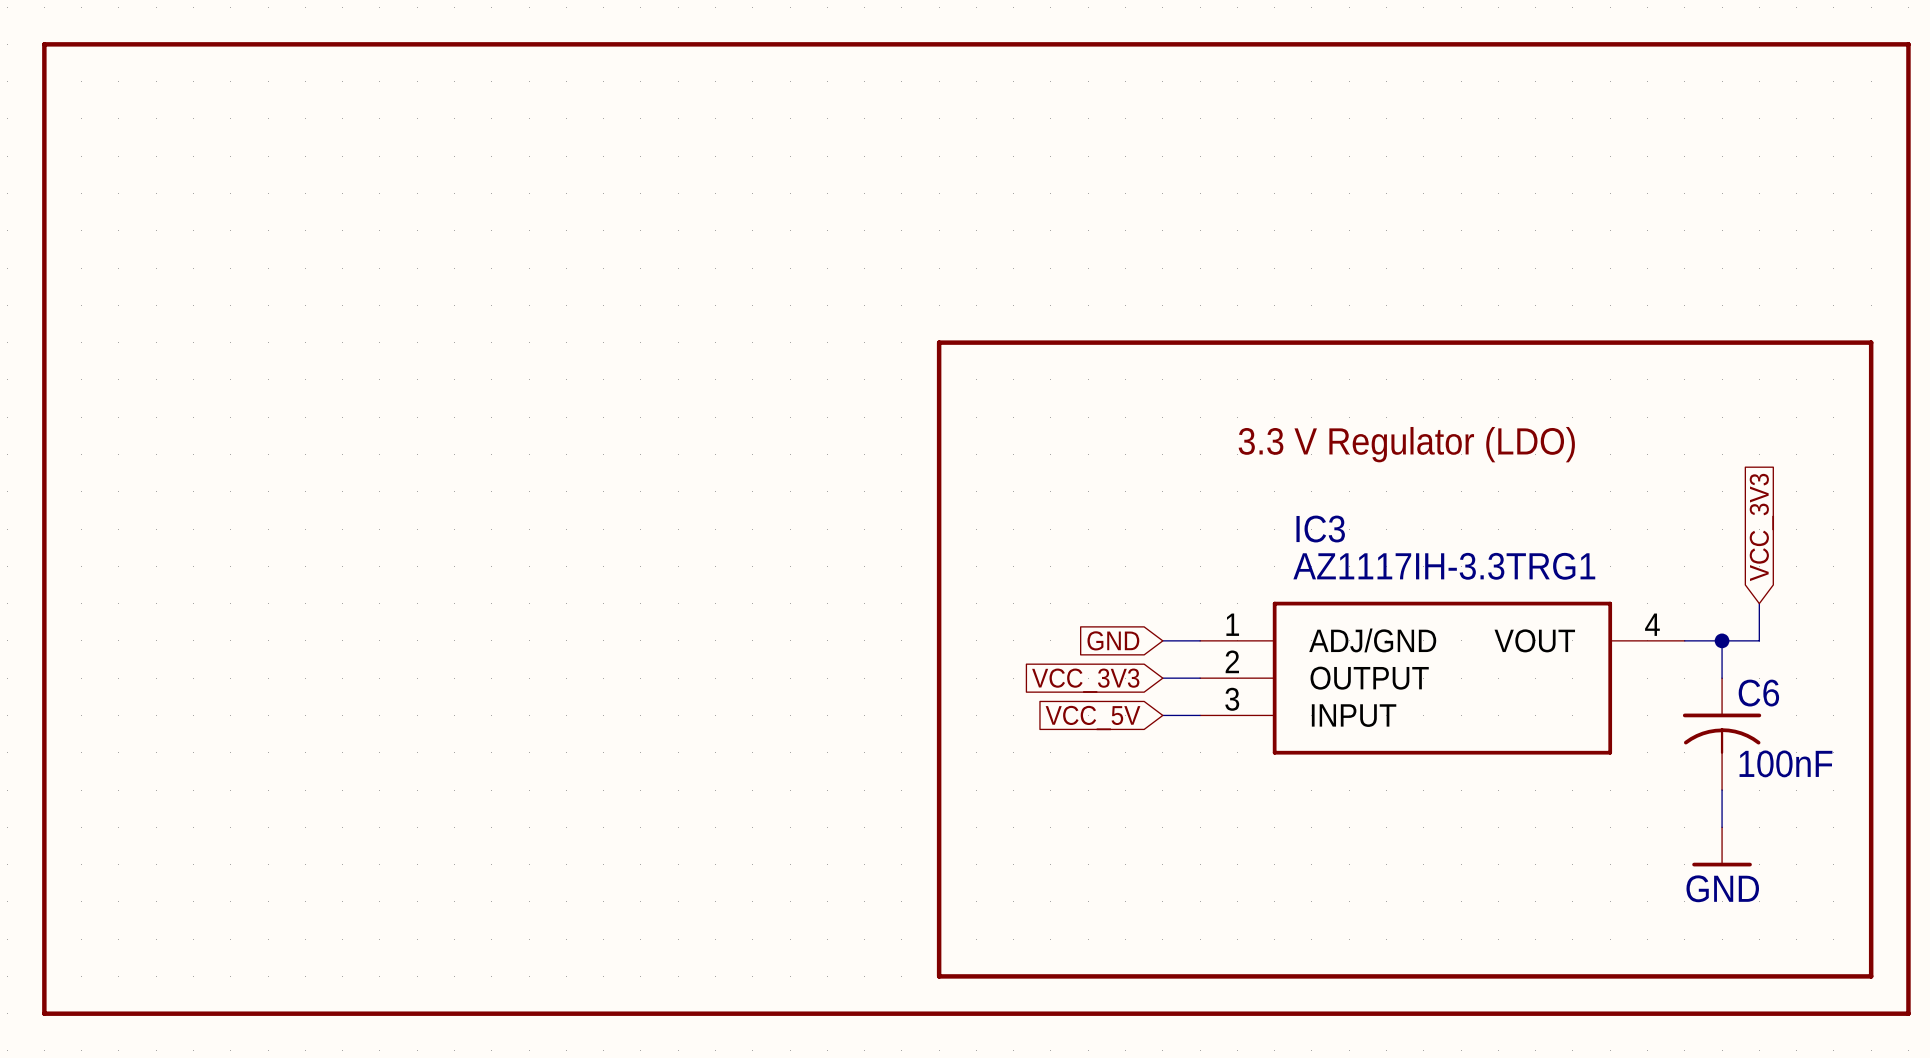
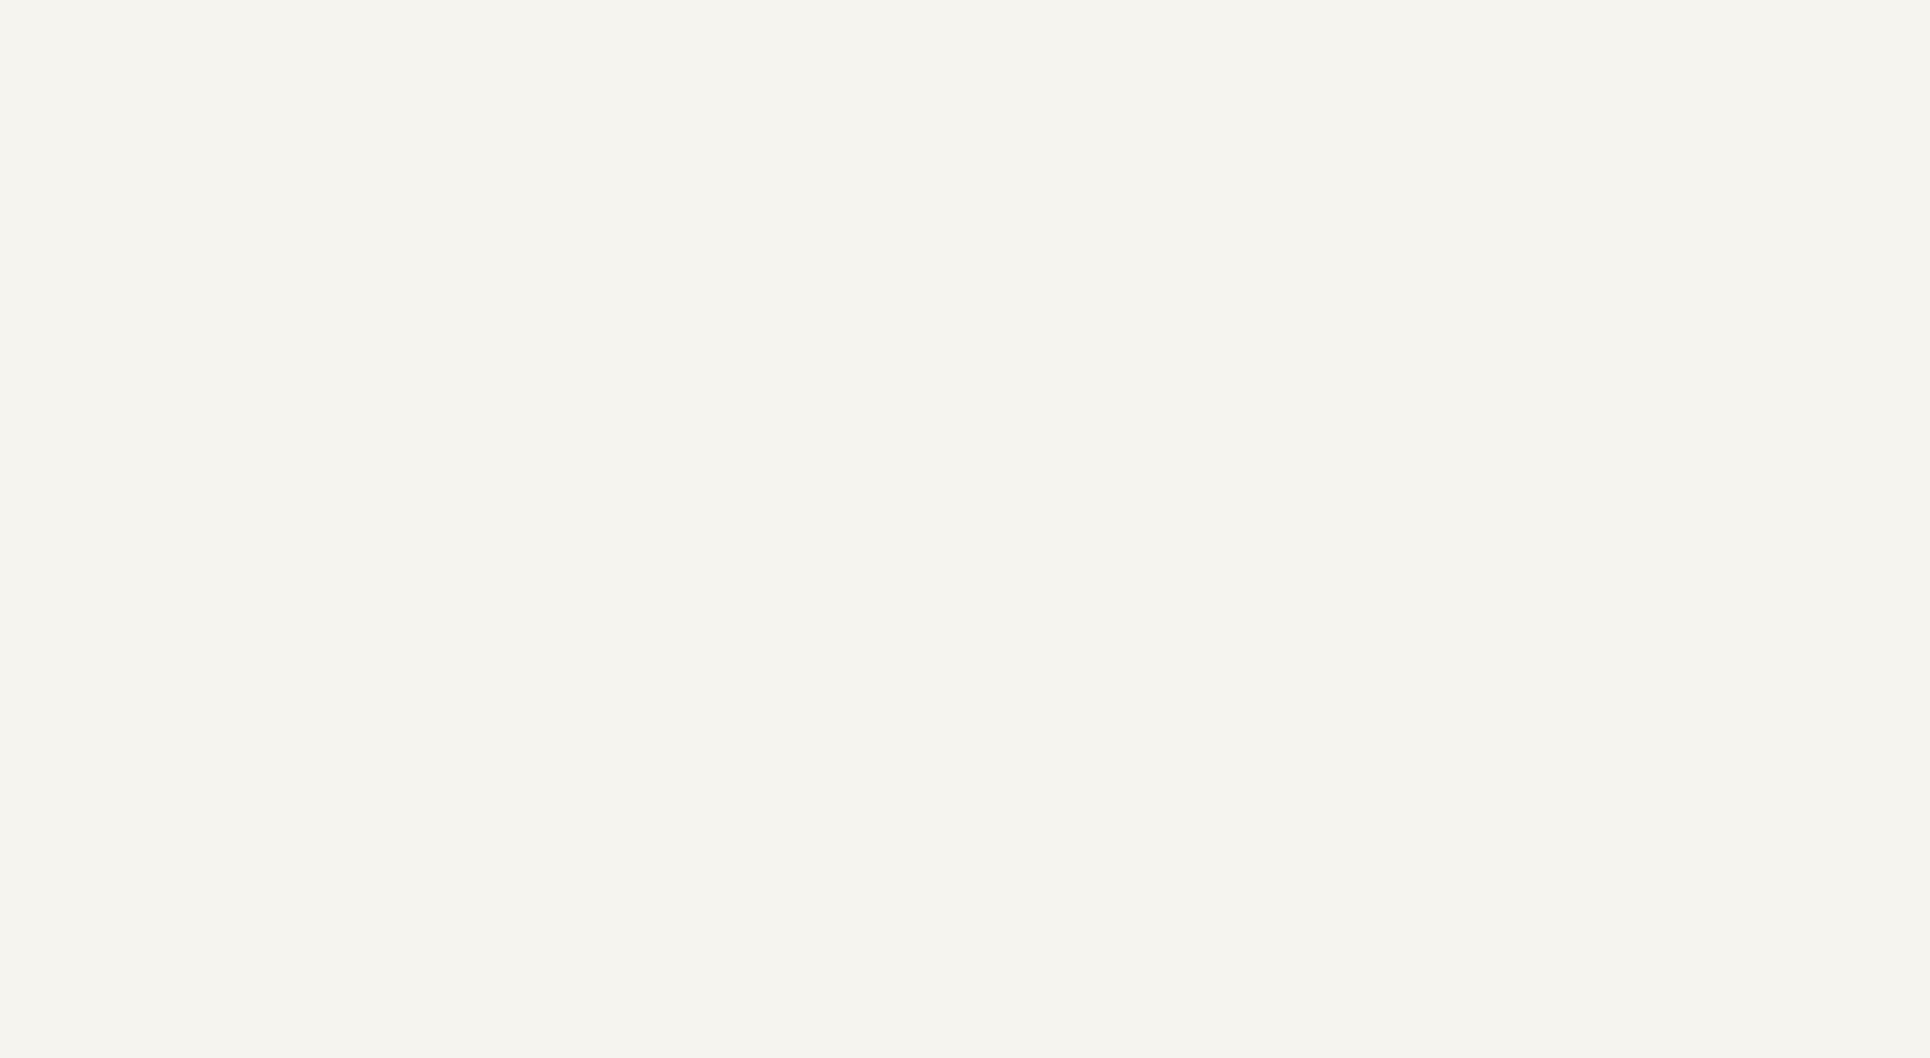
line: (44, 44) (44, 1013) (1908, 1013) (1908, 44) (44, 44) -> none
line: (939, 342) (939, 976) (1871, 976) (1871, 342) (939, 342) -> none
text: 3.3 V Regulator (LDO) (1406, 444) -> none
global label: VCC_3V3 (1761, 527) -> none
wire: (1759, 603) (1759, 640) (1684, 640) -> none
global label: GND (1113, 640) -> none
wire: (1162, 640) (1200, 640) -> none
wire: (1722, 640) (1722, 678) -> none
junction: (1722, 640) -> none
wire: (1162, 678) (1200, 678) -> none
IC3: AZ1117IH-3.3TRG1 (1442, 678) -> none
global label: VCC_3V3 (1085, 680) -> none
wire: (1162, 715) (1200, 715) -> none
global label: VCC_5V (1093, 717) -> none
C6: 100nF (1722, 734) -> none
wire: (1722, 790) (1722, 827) -> none
power symbol: GND (1722, 846) -> none

